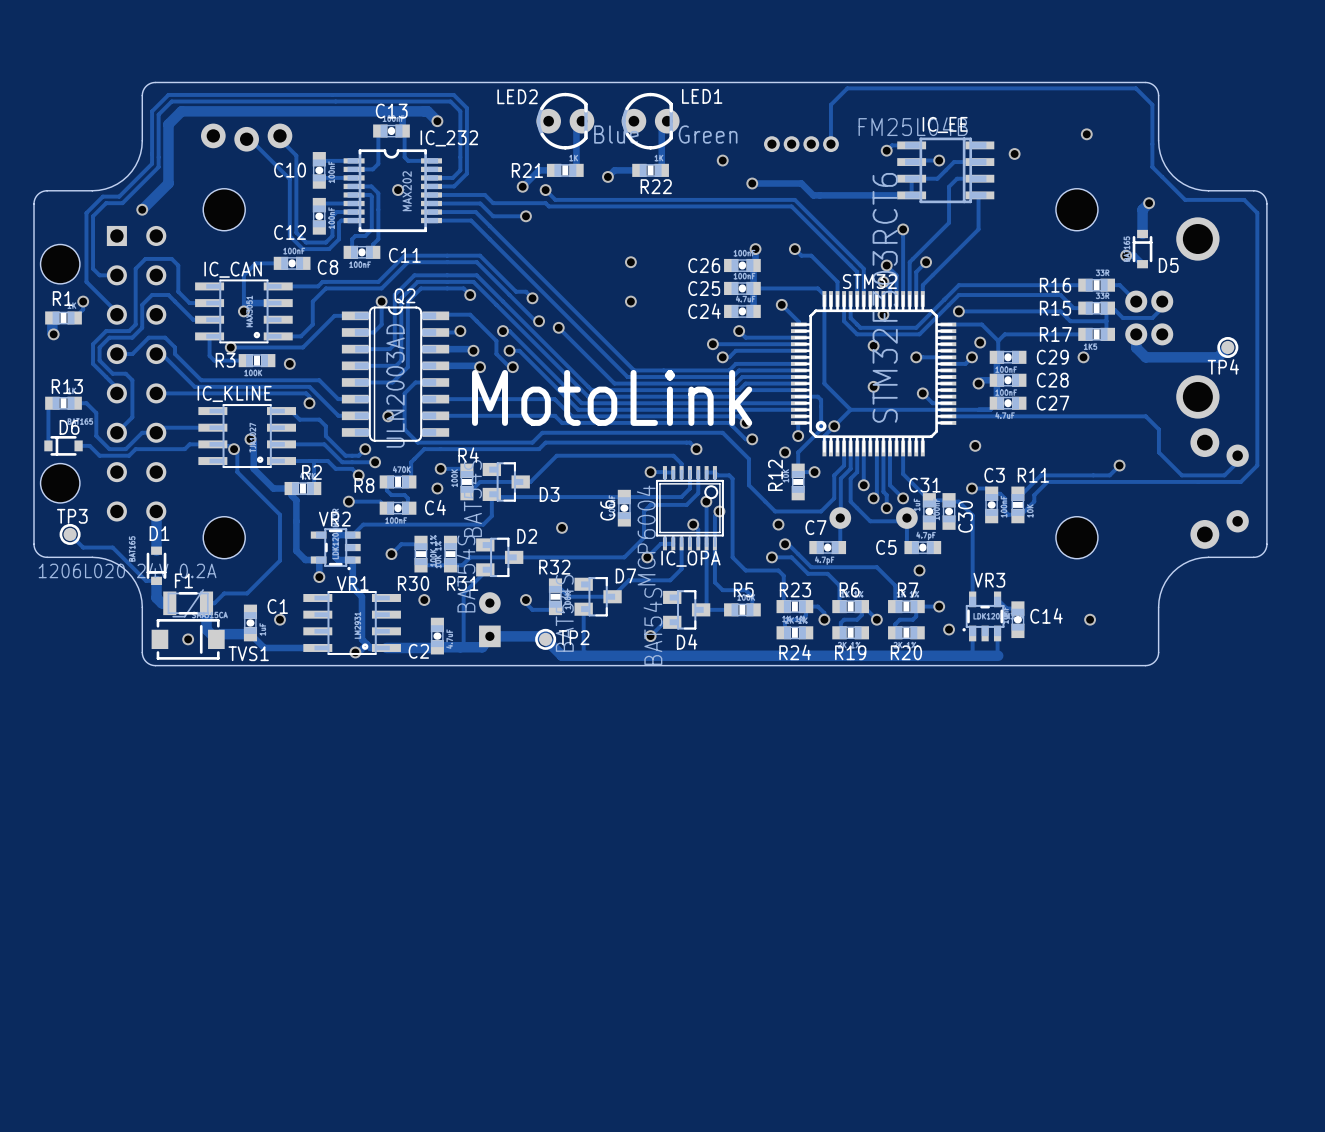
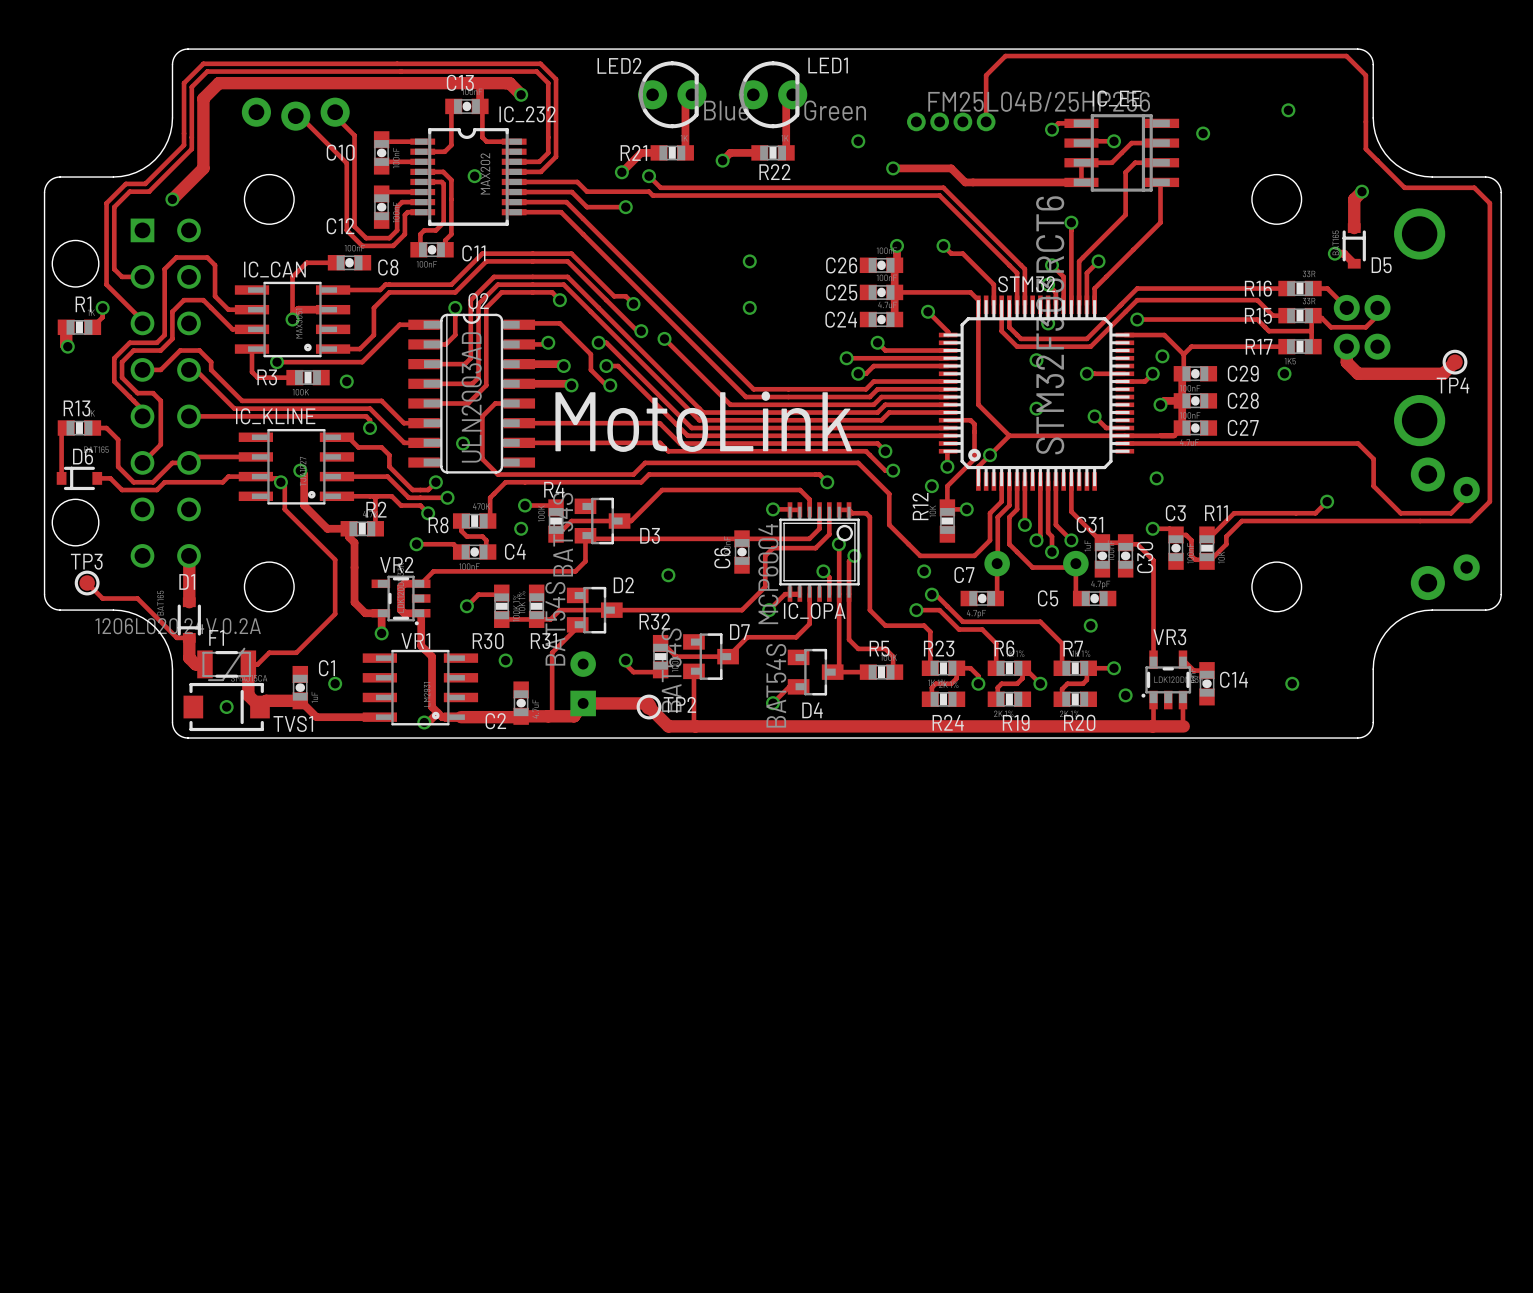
IC_EE value: FM25L04B (913, 126) -> FM25L04B/25HP256 (1039, 101)

